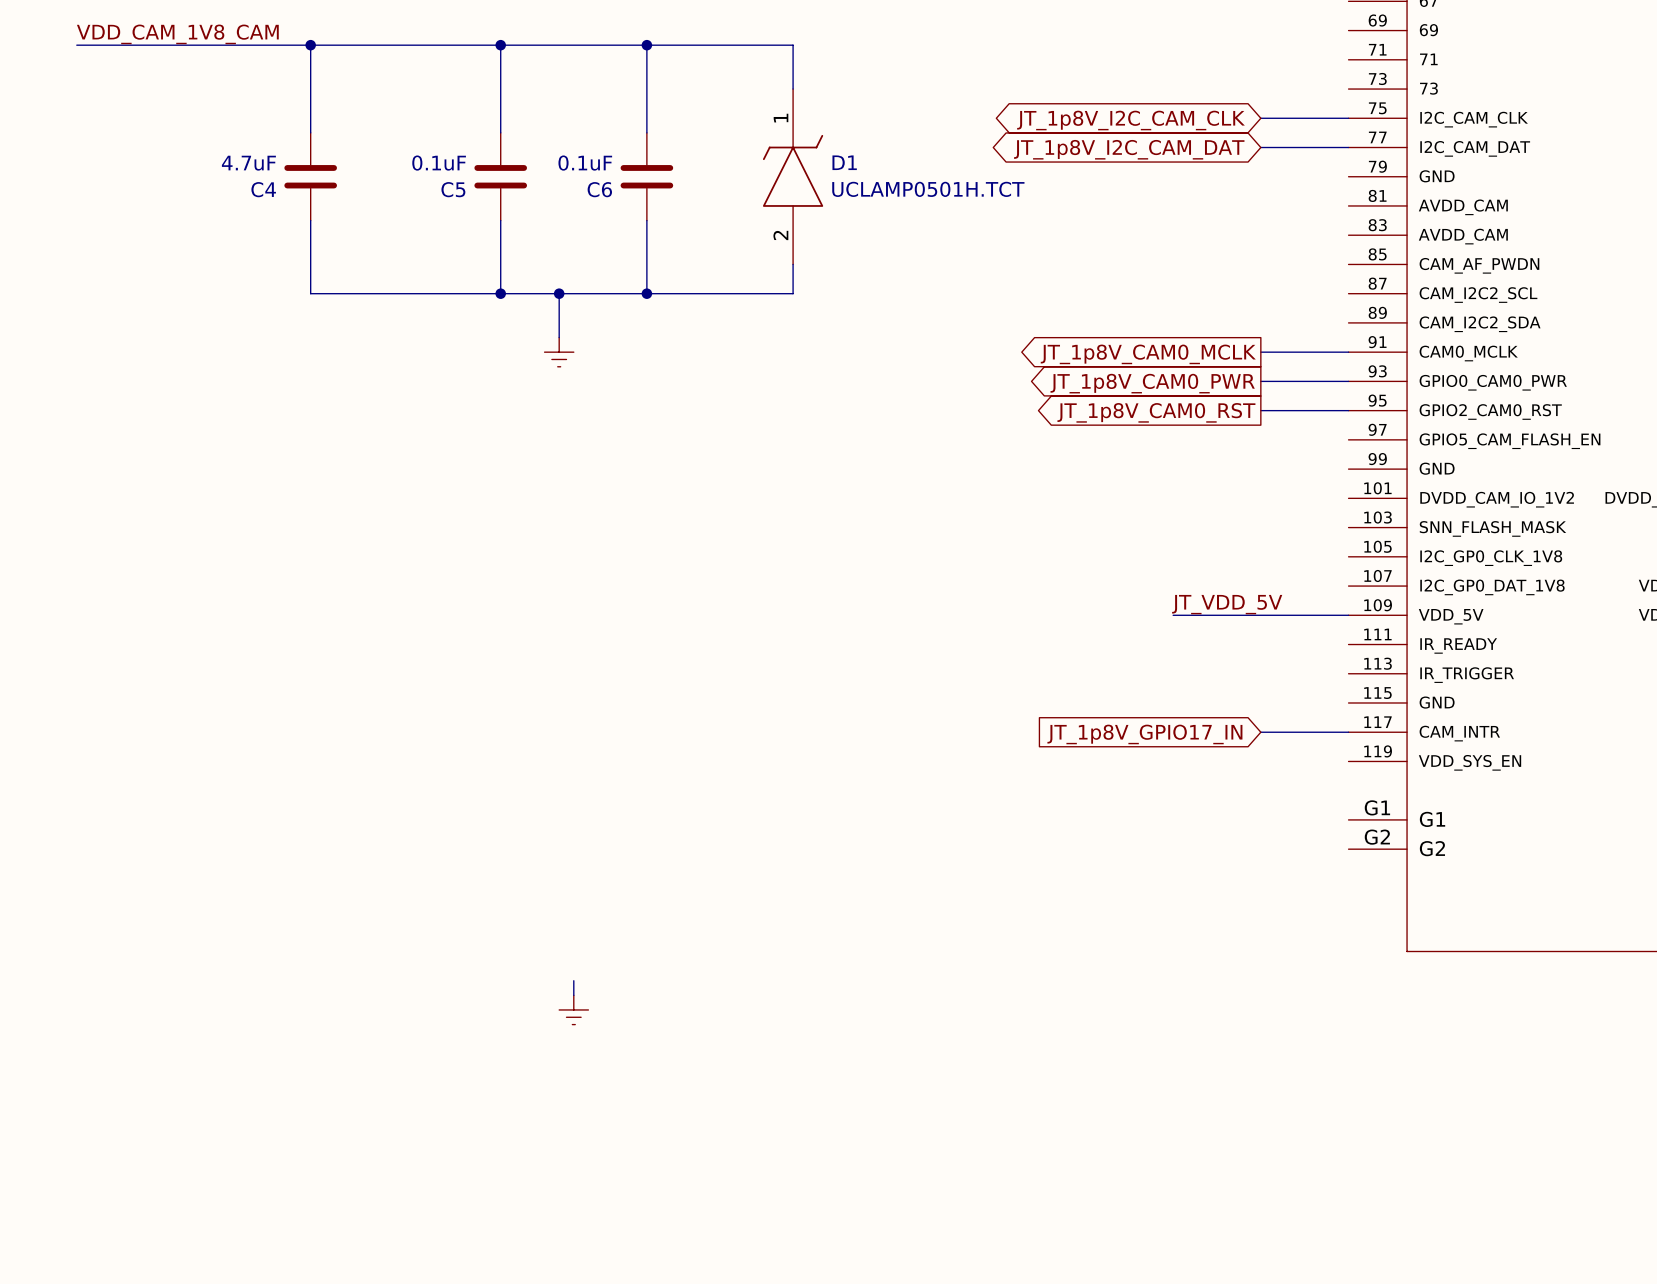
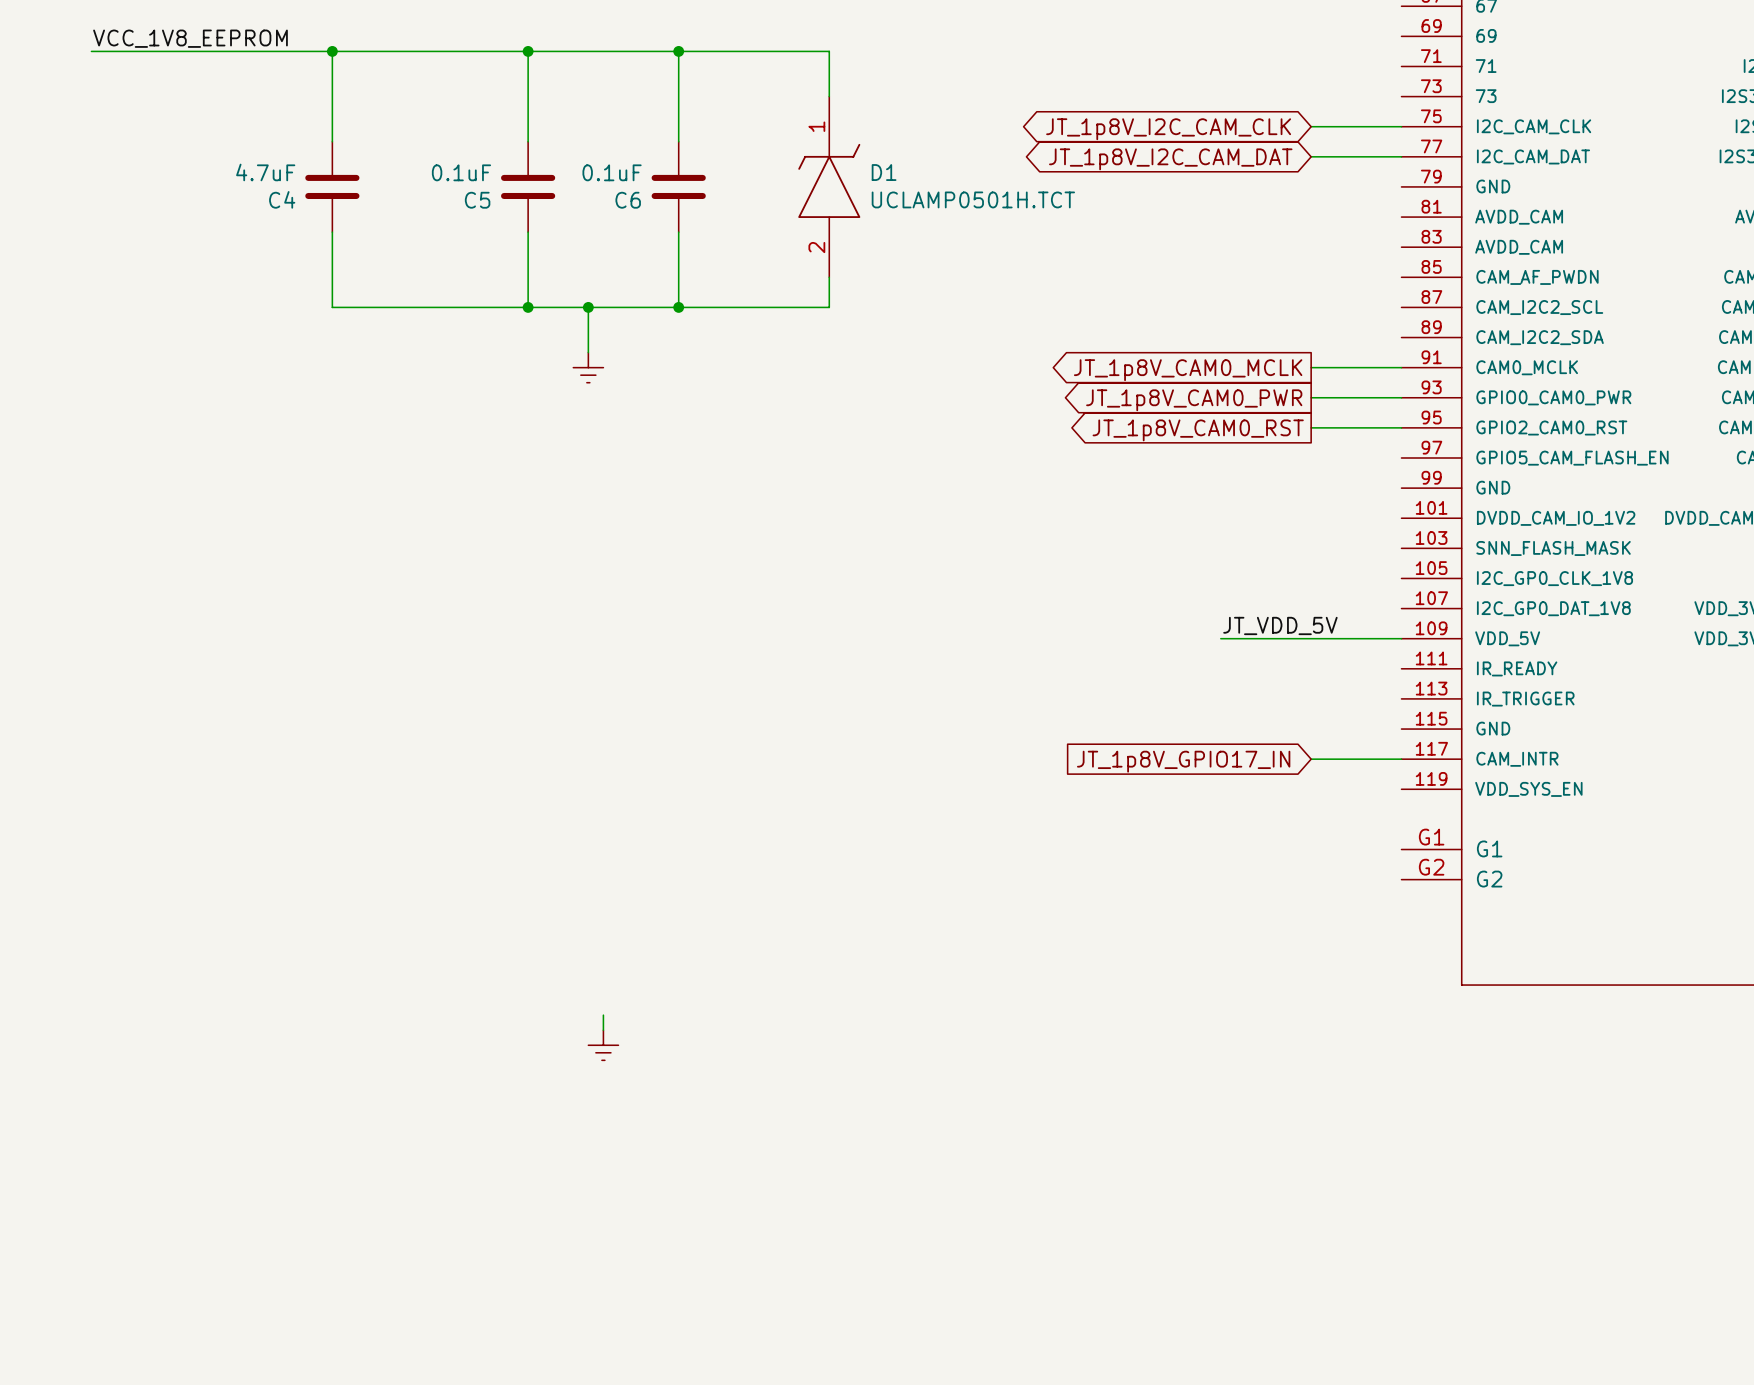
label: VDD_CAM_1V8_CAM (177, 34) -> VCC_1V8_EEPROM (190, 38)

